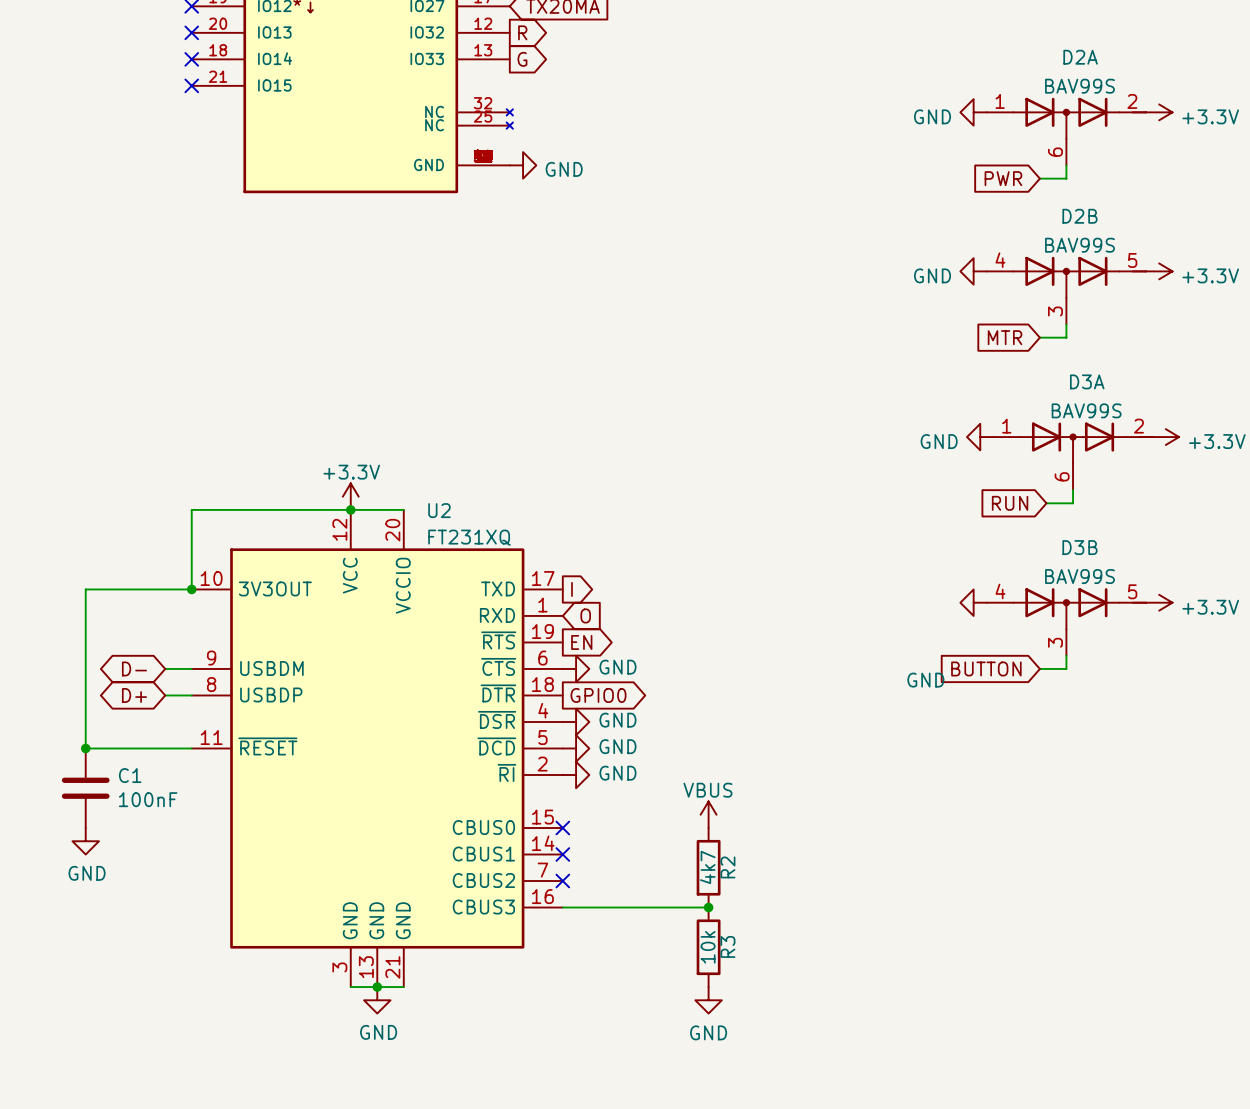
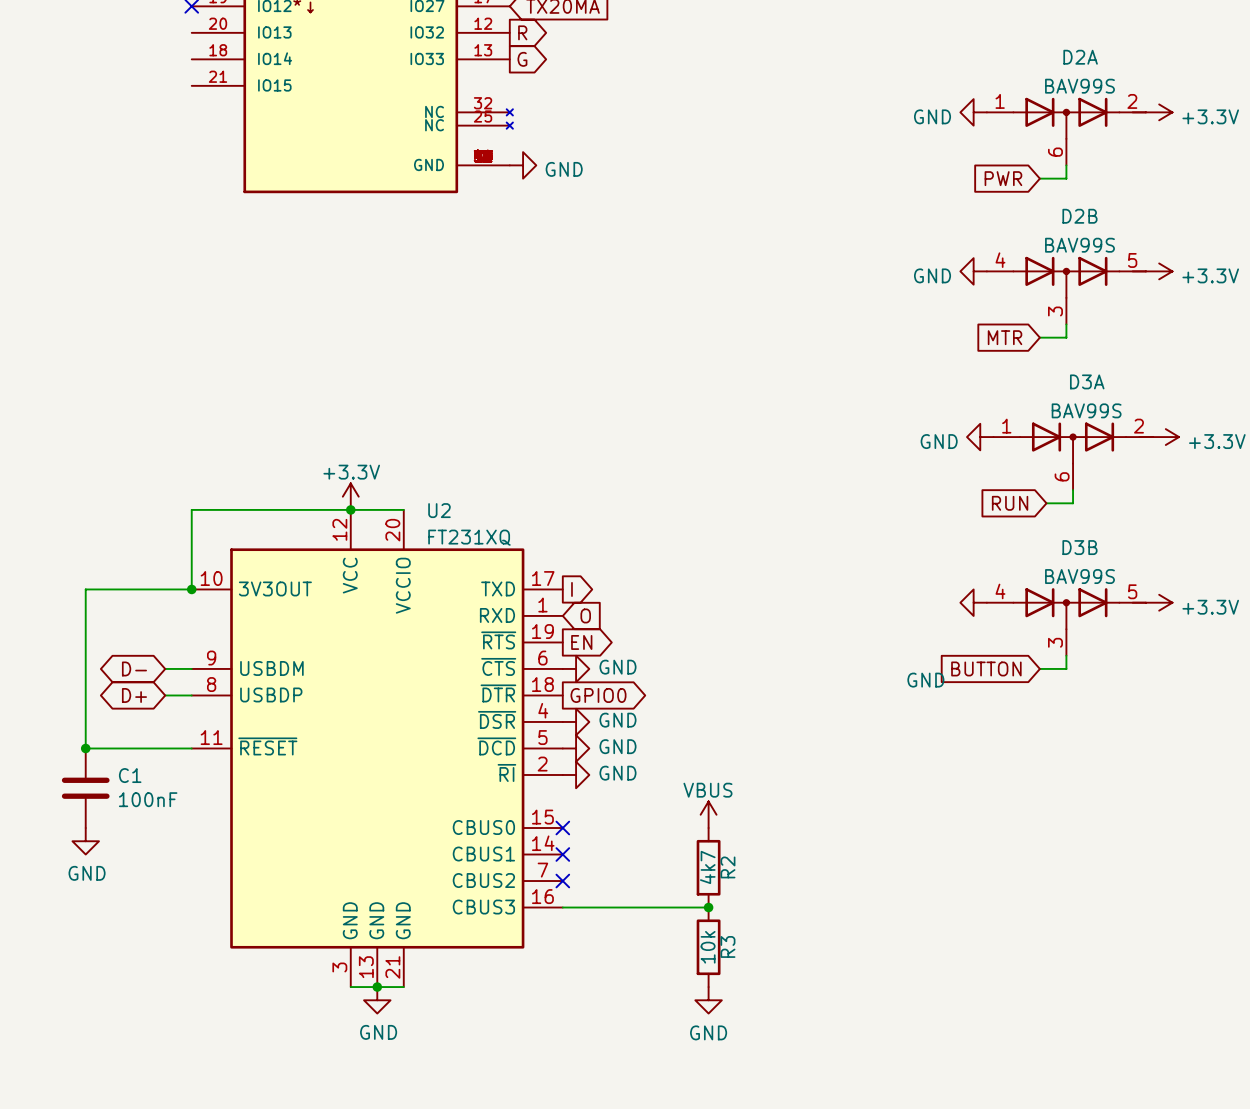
no-connect mark: (191, 32) -> none
no-connect mark: (191, 59) -> none
no-connect mark: (191, 85) -> none

